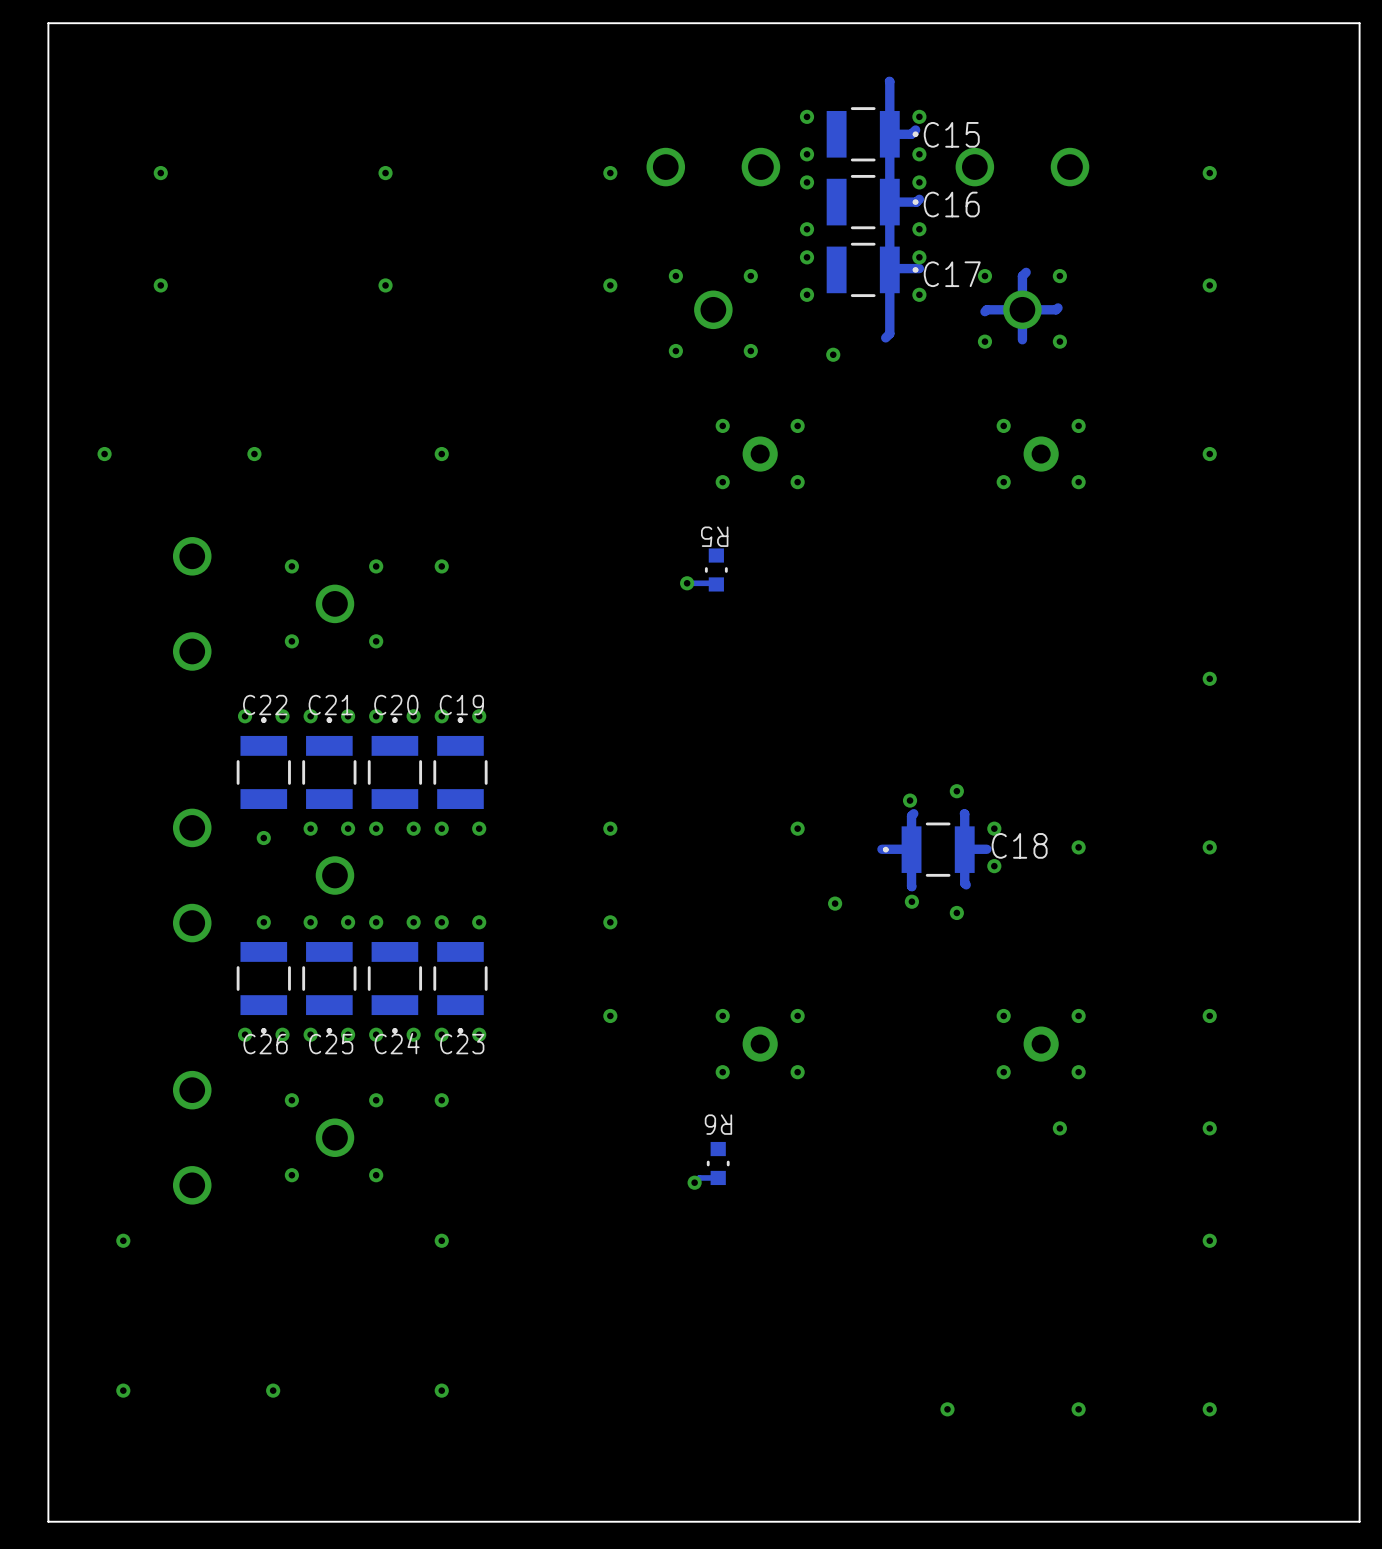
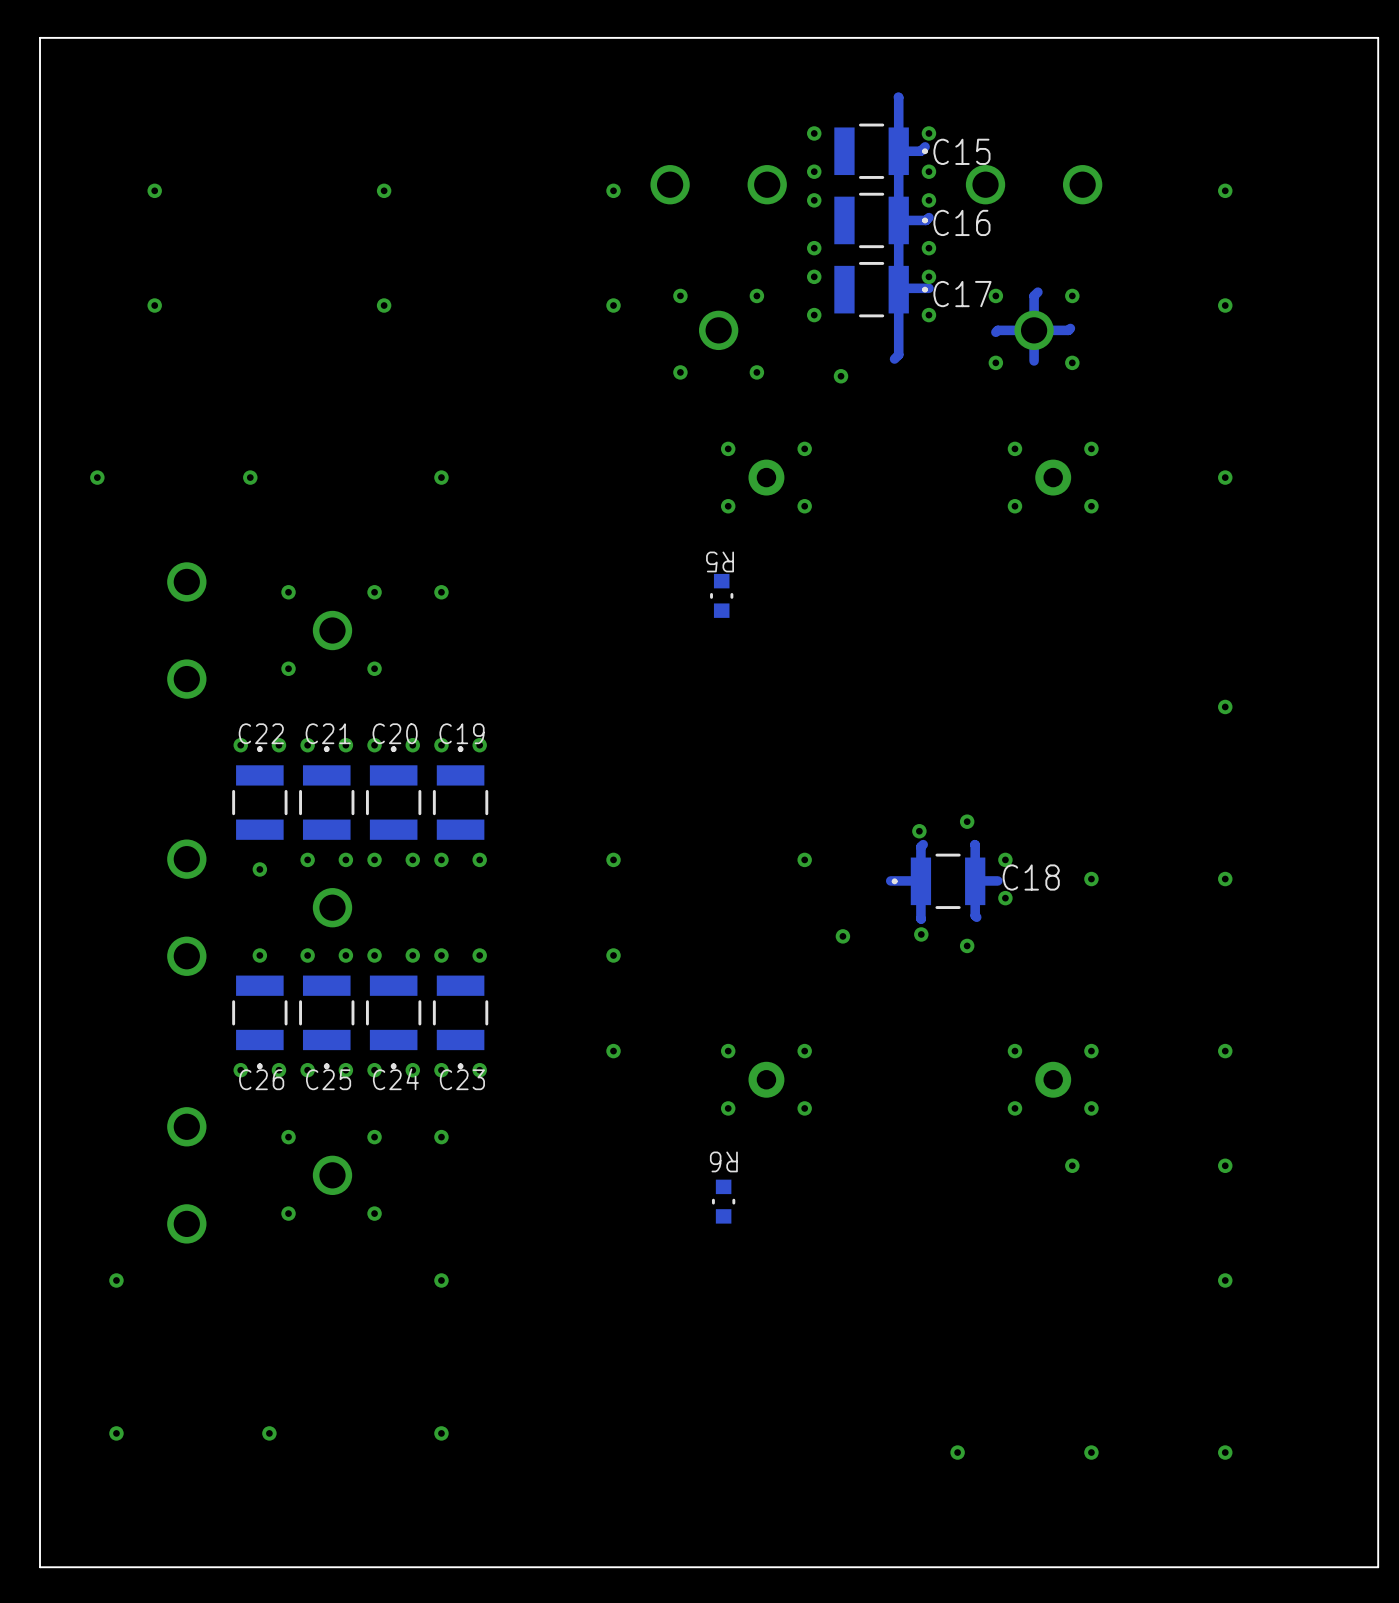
track: (687, 583) (716, 584) -> none
via: (687, 583) -> none
track: (718, 1177) (699, 1177) (694, 1182) -> none
via: (694, 1182) -> none

